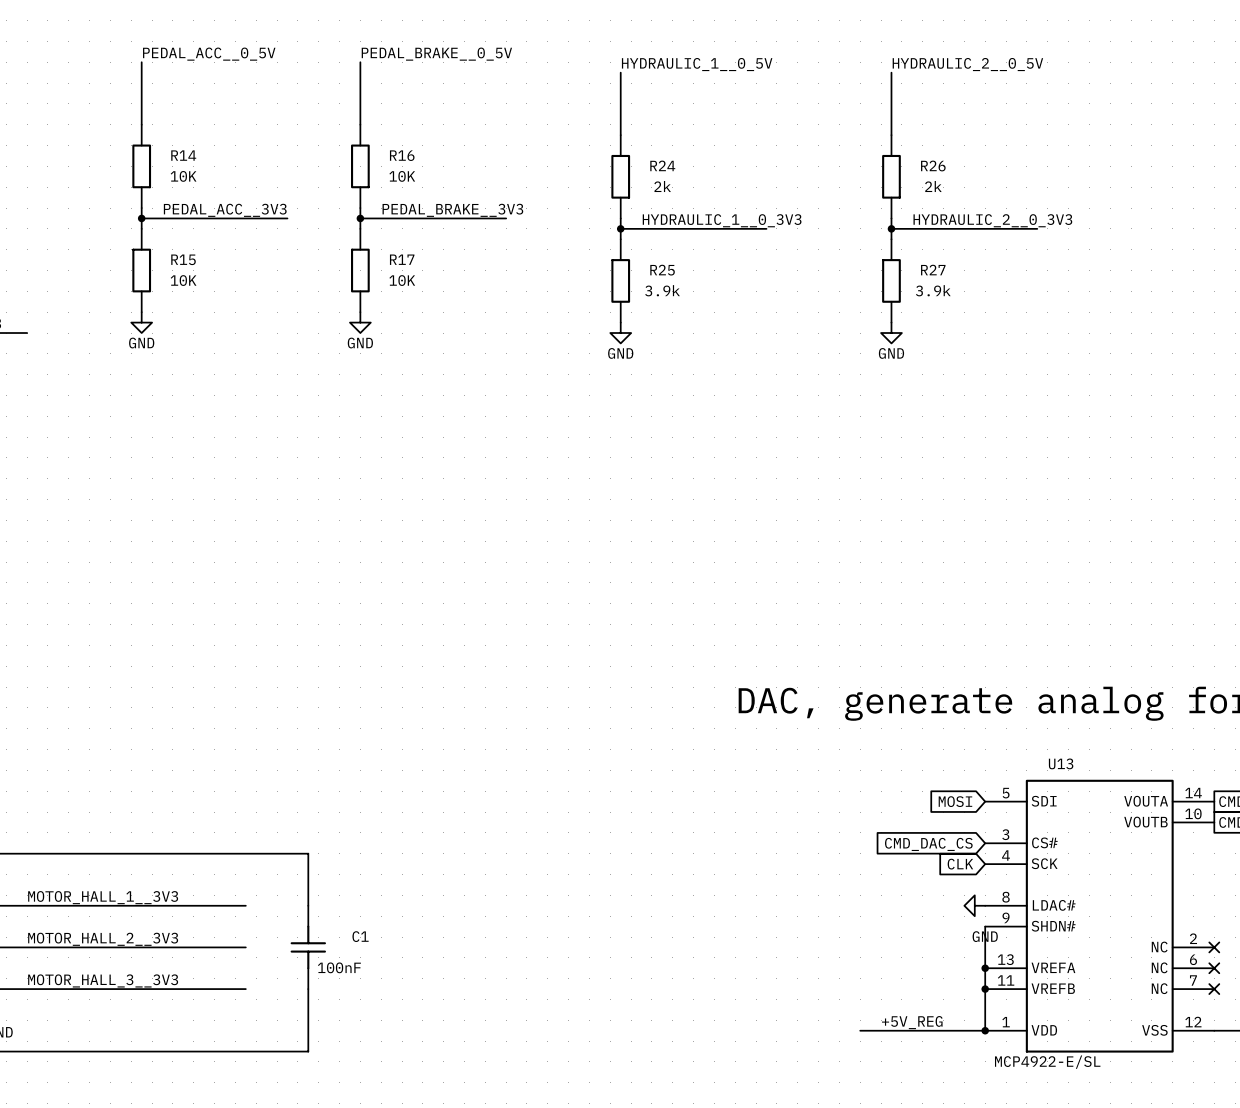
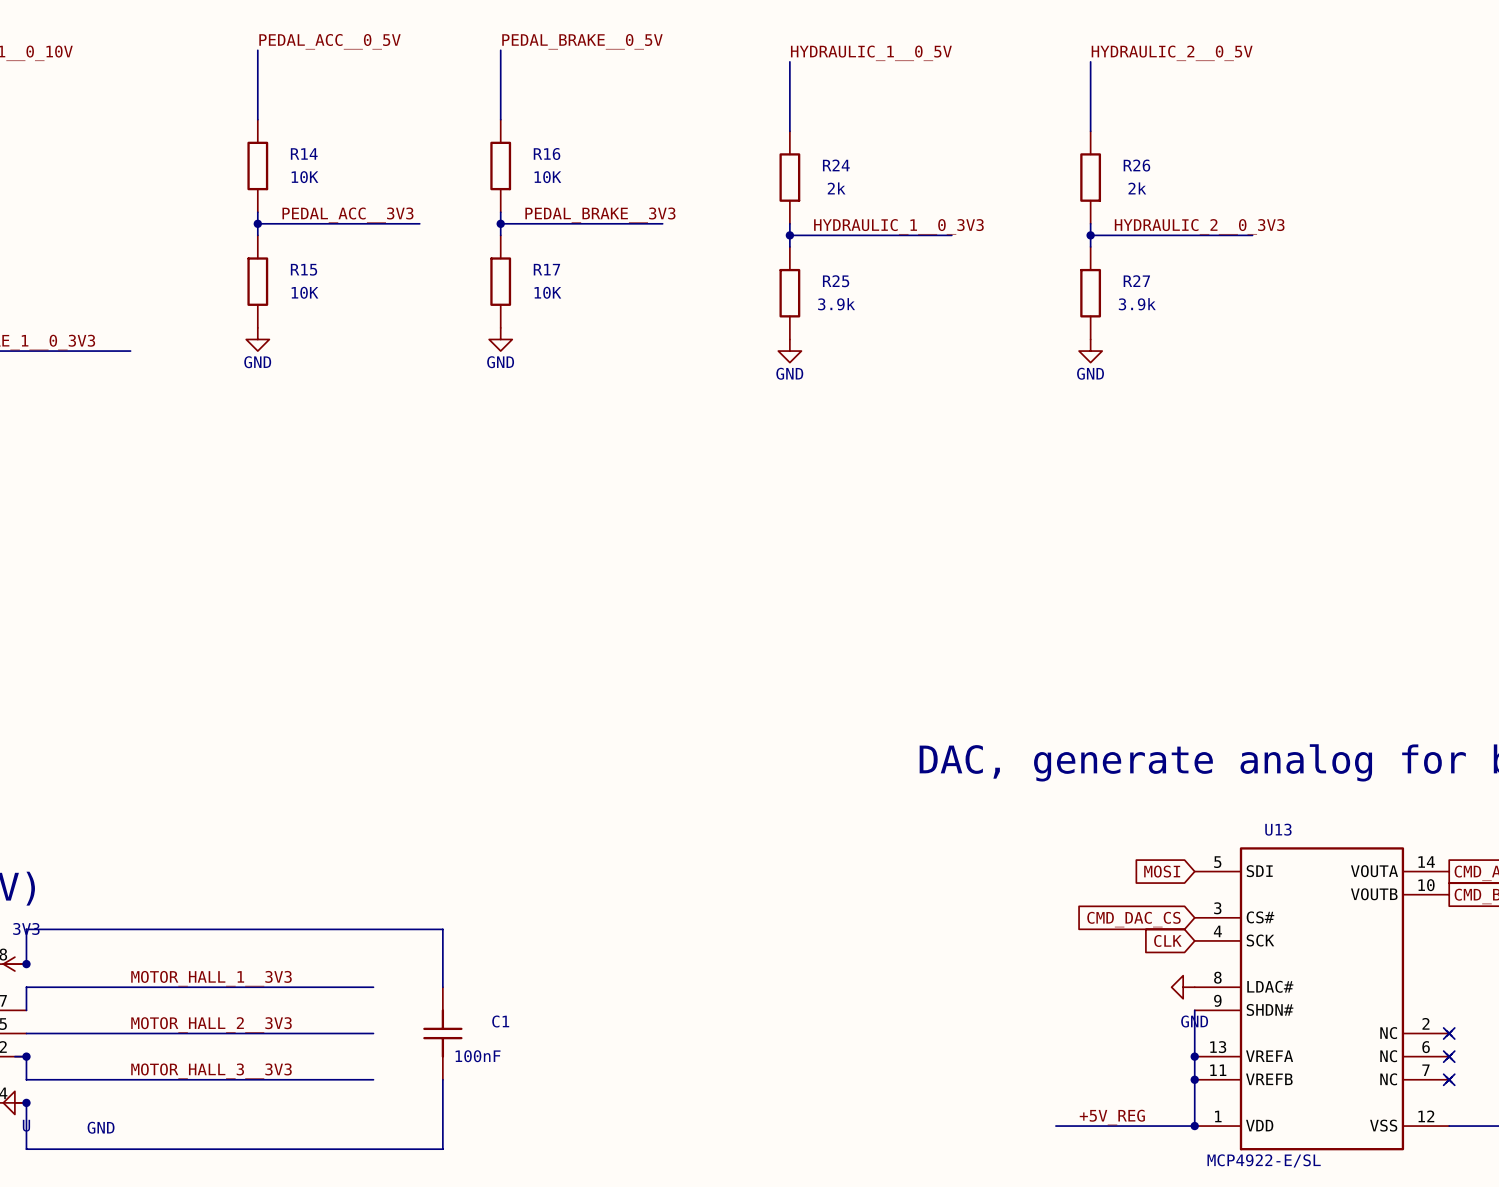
U13 symbol: [985, 779, 1215, 1053] -> [1194, 847, 1452, 1151]

